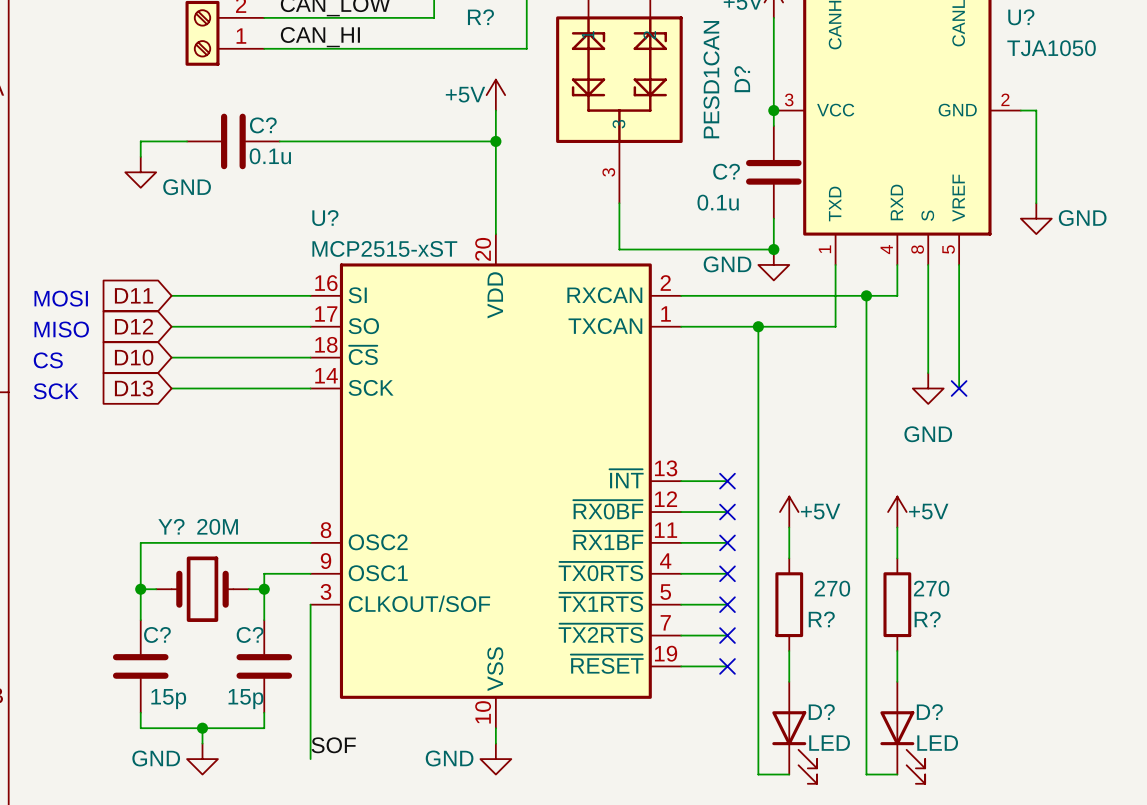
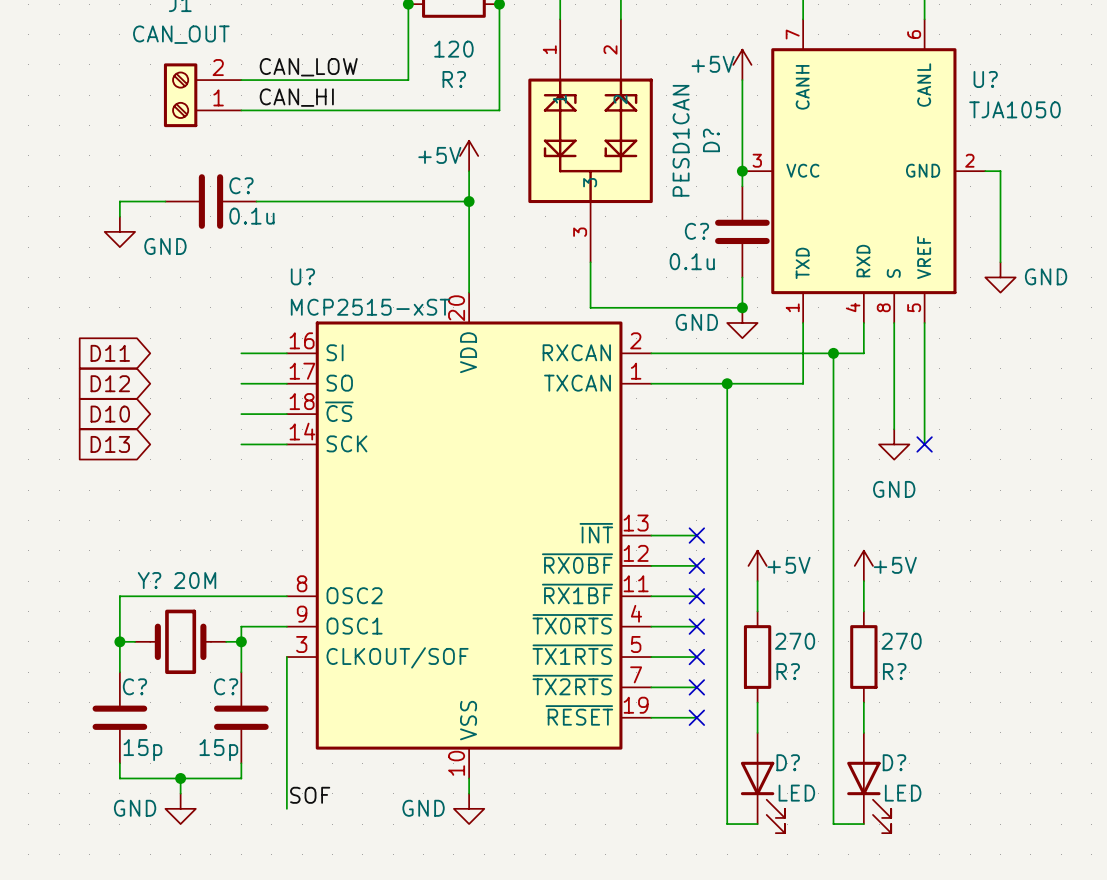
wire: (171, 295) (264, 295) -> none
text: MOSI (61, 298) -> none
wire: (171, 326) (264, 326) -> none
text: MISO (61, 329) -> none
wire: (171, 357) (264, 357) -> none
text: CS (48, 360) -> none
wire: (171, 388) (264, 388) -> none
text: SCK (56, 391) -> none

